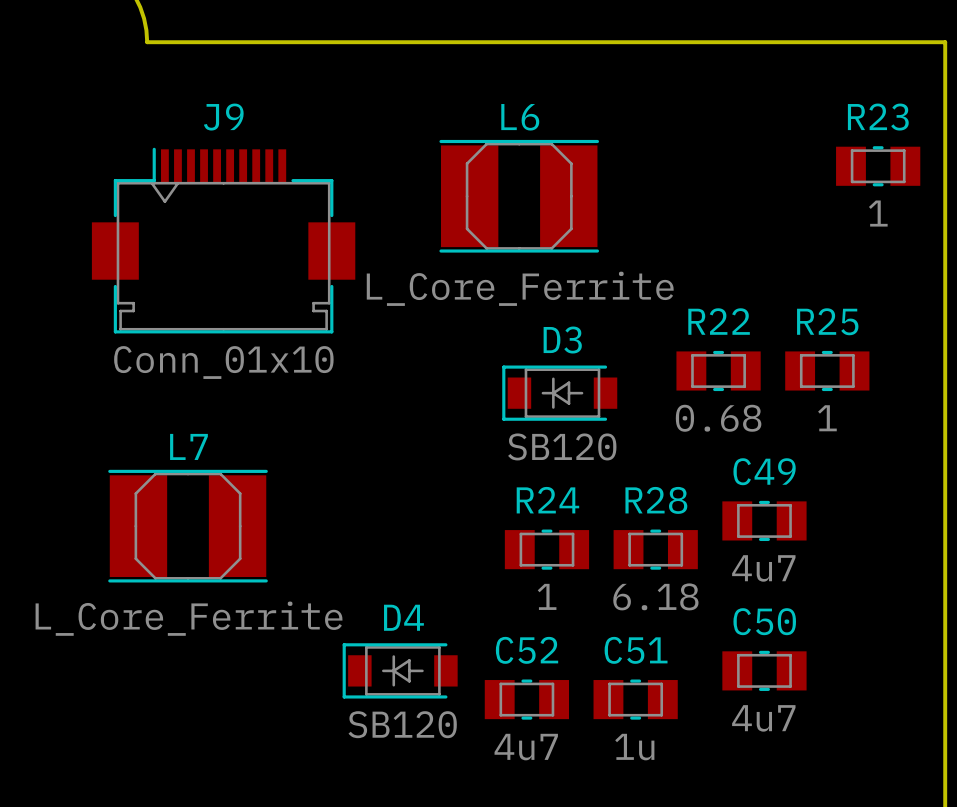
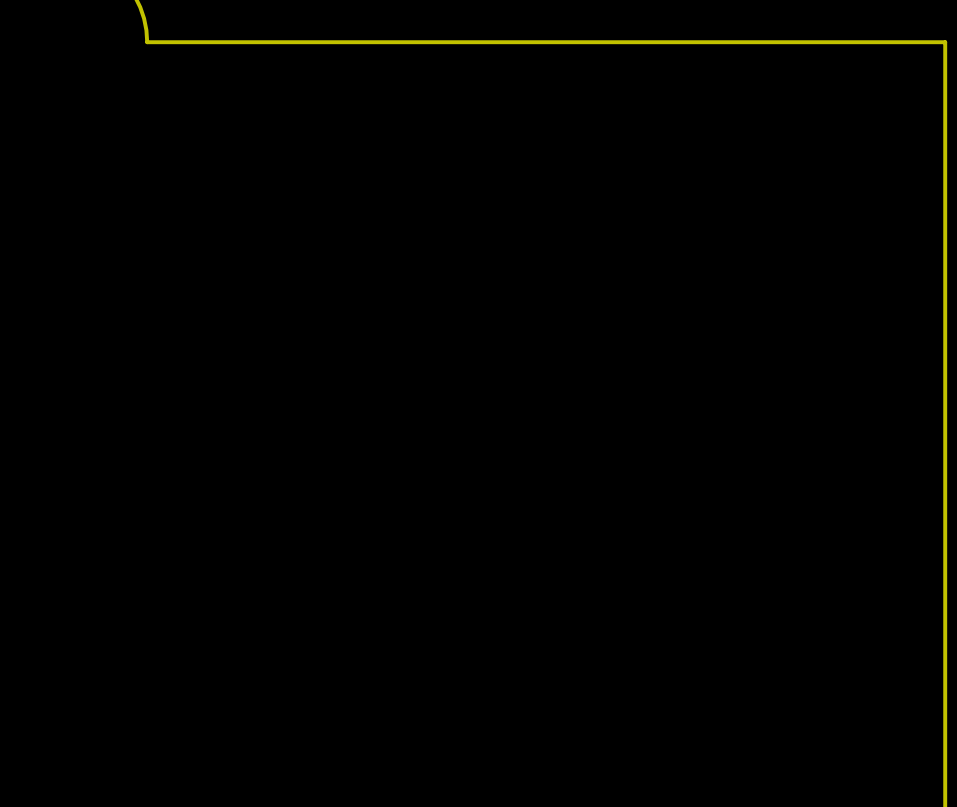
R23: 1 (878, 166) -> none
L6: L_Core_Ferrite (519, 196) -> none
J9: Conn_01x10 (223, 240) -> none
R22: 0.68 (718, 370) -> none
R25: 1 (827, 370) -> none
D3: SB120 (559, 393) -> none
C49: 4u7 (764, 520) -> none
L7: L_Core_Ferrite (188, 526) -> none
R24: 1 (546, 549) -> none
R28: 6.18 (655, 549) -> none
D4: SB120 (400, 670) -> none
C50: 4u7 (764, 670) -> none
C52: 4u7 (526, 699) -> none
C51: 1u (635, 699) -> none

